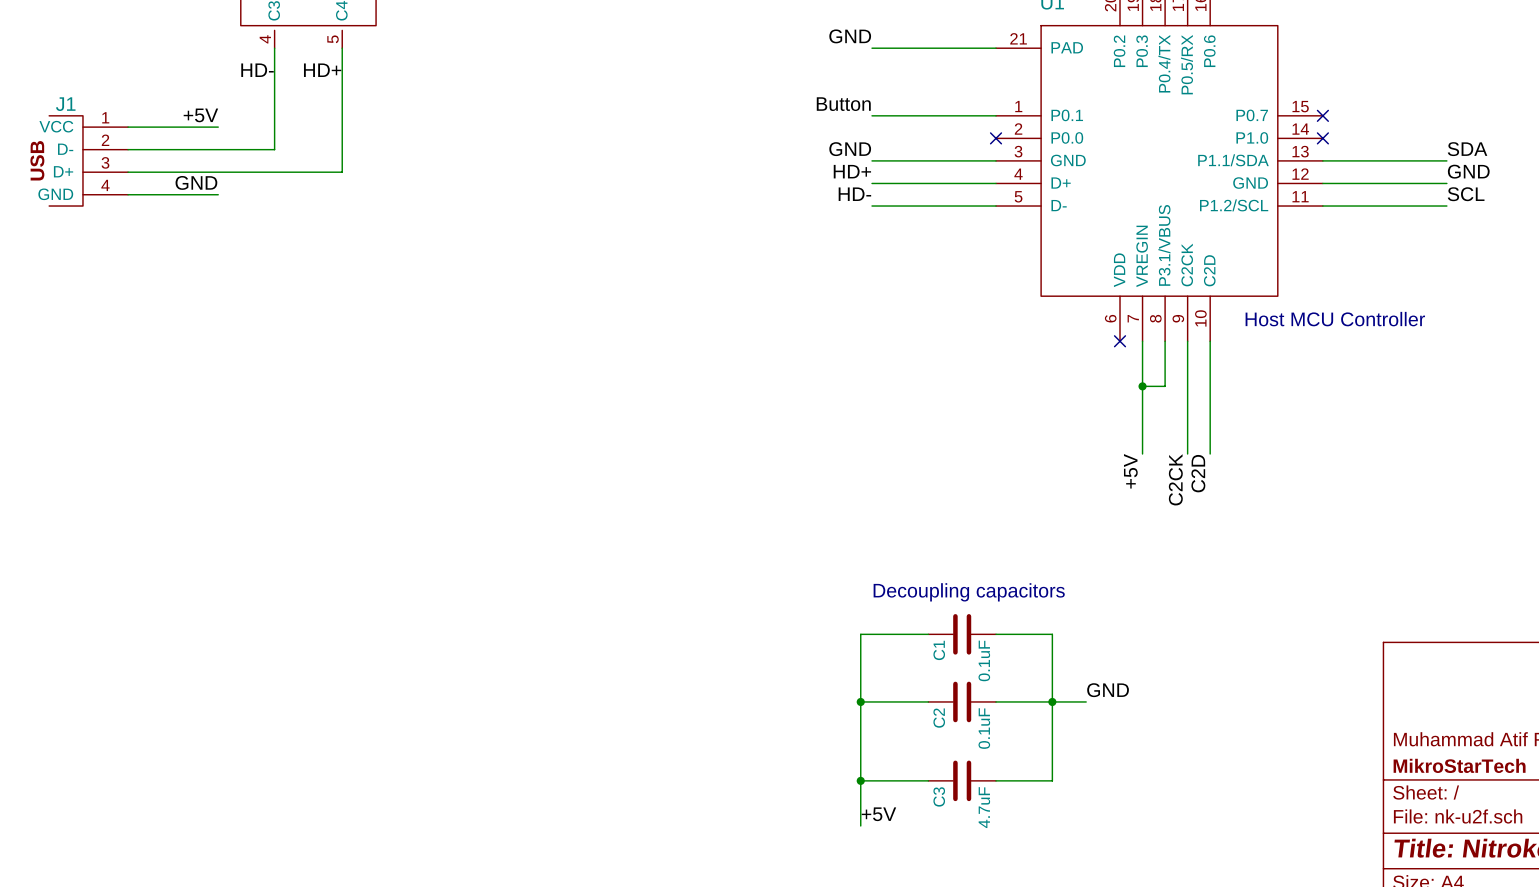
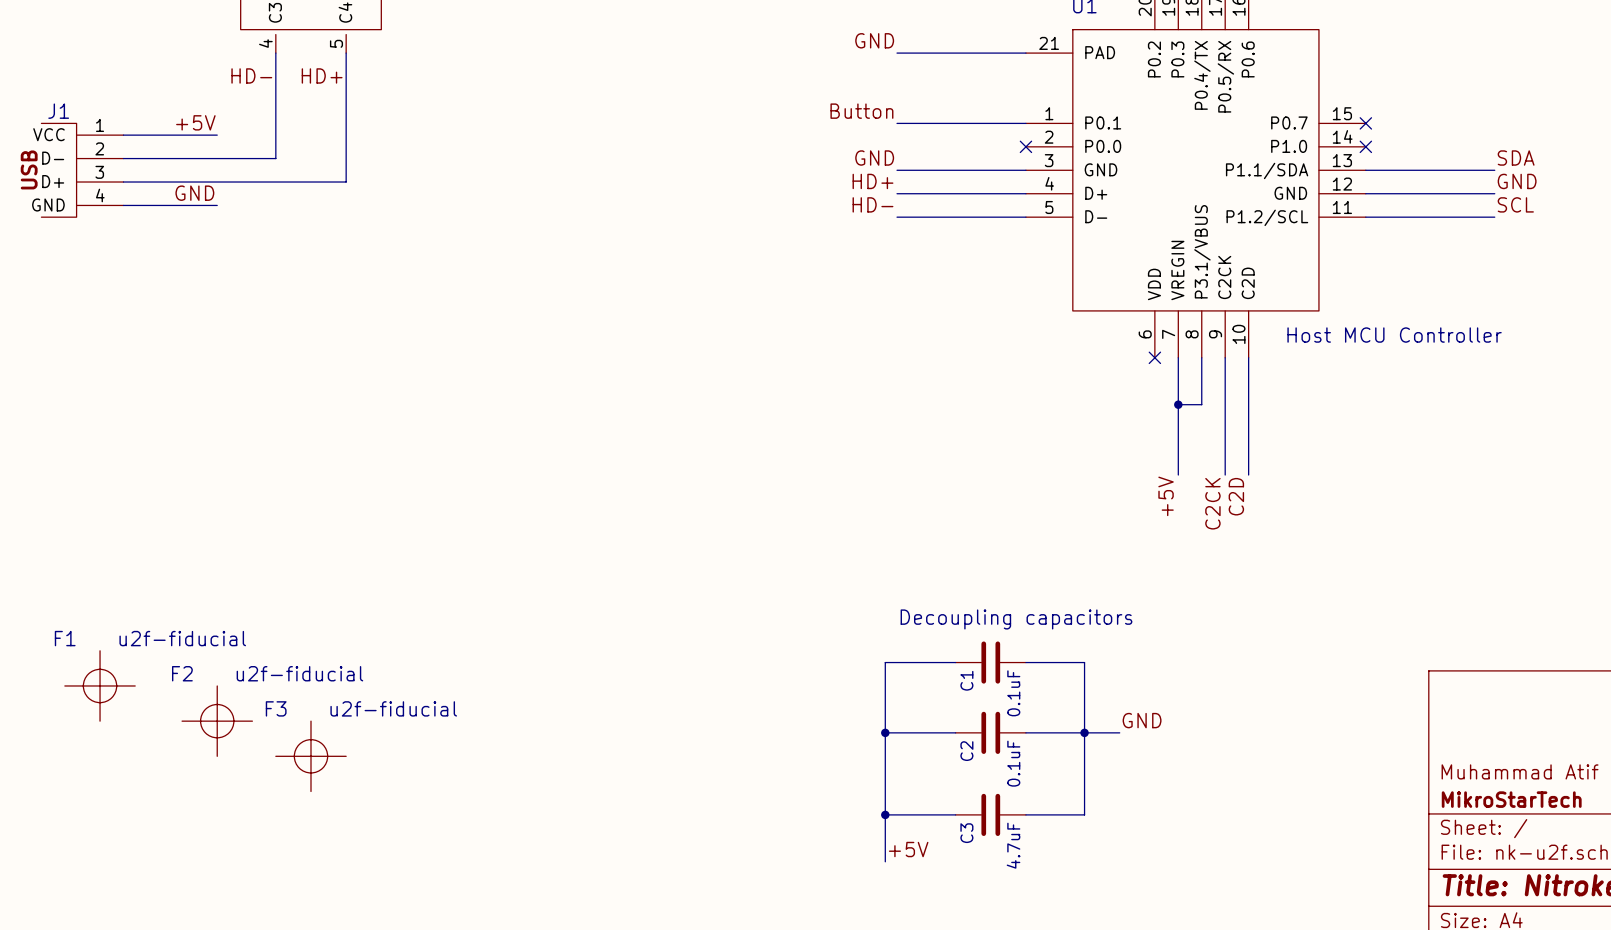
F1: none -> u2f-fiducial (100, 685)
F2: none -> u2f-fiducial (217, 721)
F3: none -> u2f-fiducial (310, 756)

